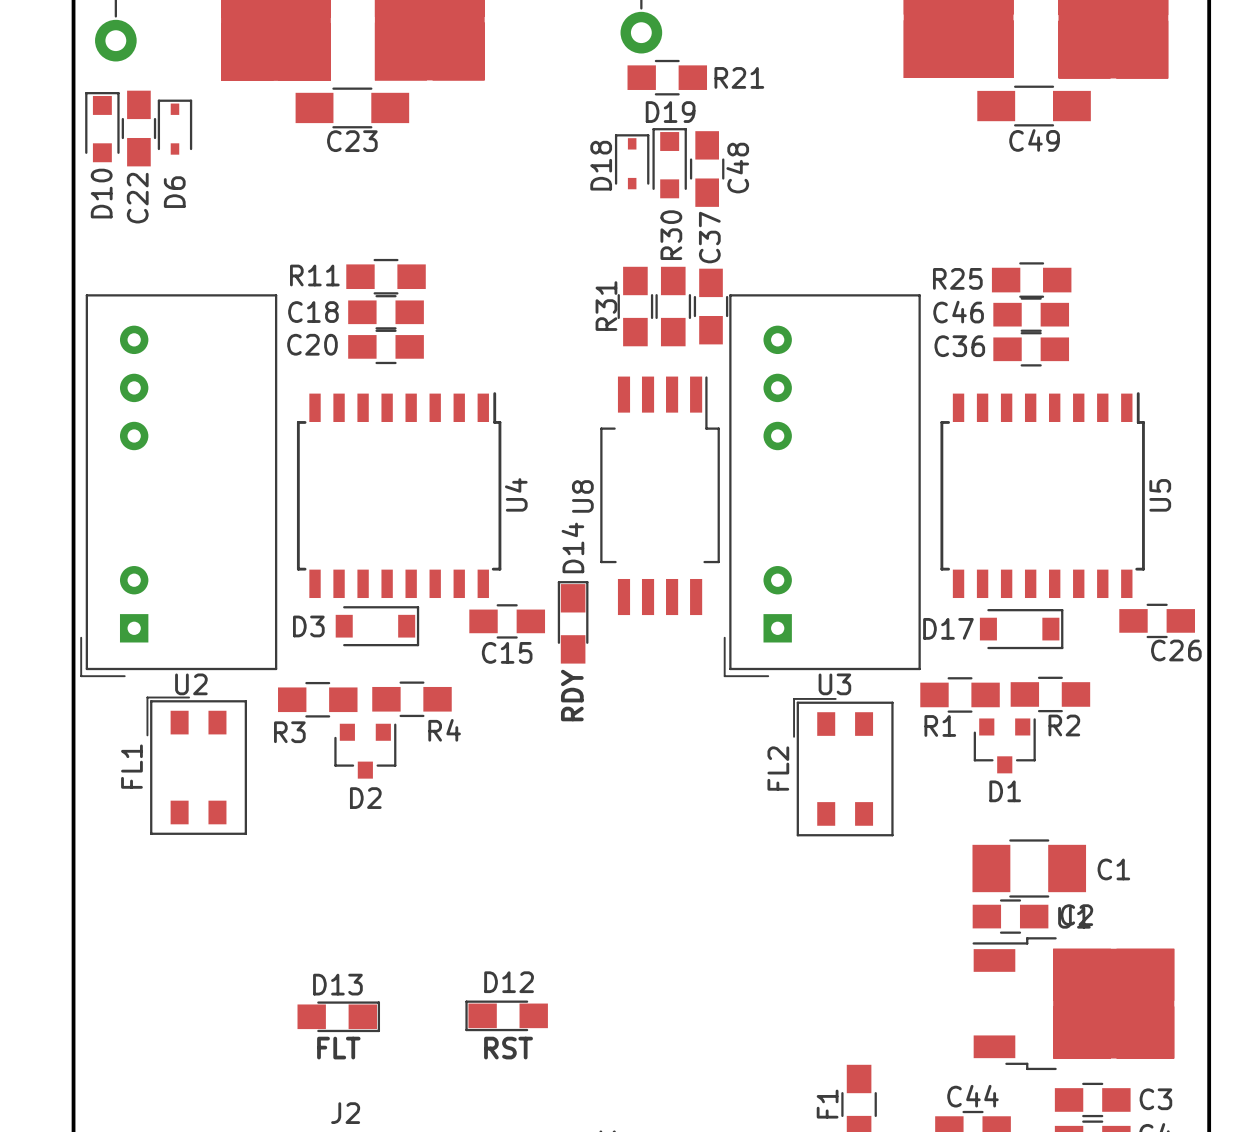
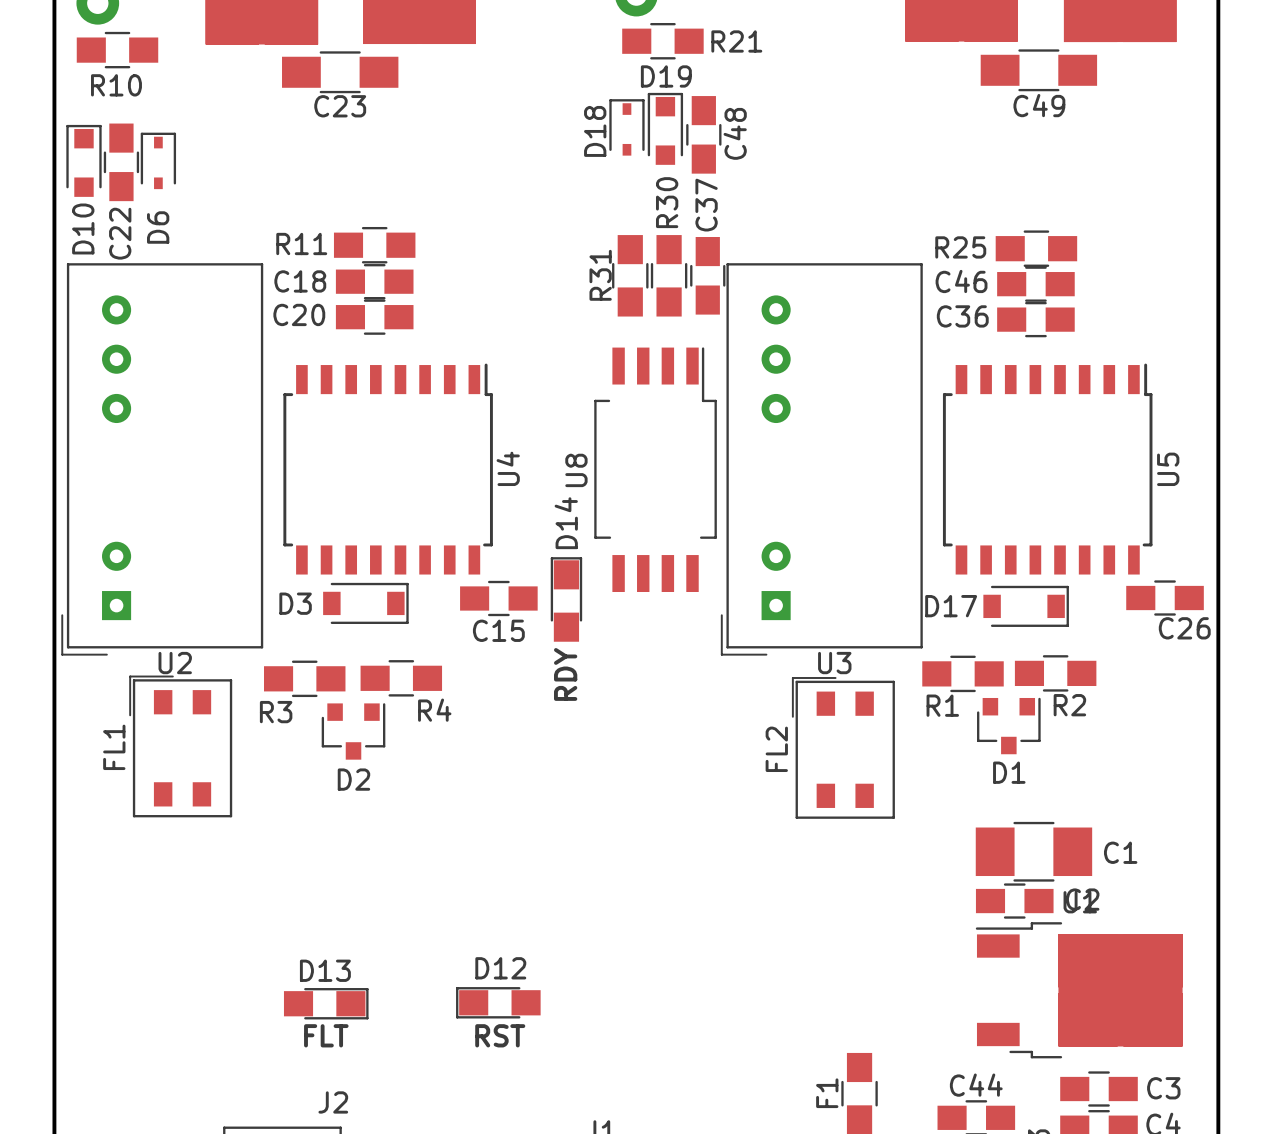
R10: none -> (117, 50)
D10 position: (102, 127) -> (83, 160)
D6 position: (174, 127) -> (158, 160)
C22 position: (138, 128) -> (121, 162)

